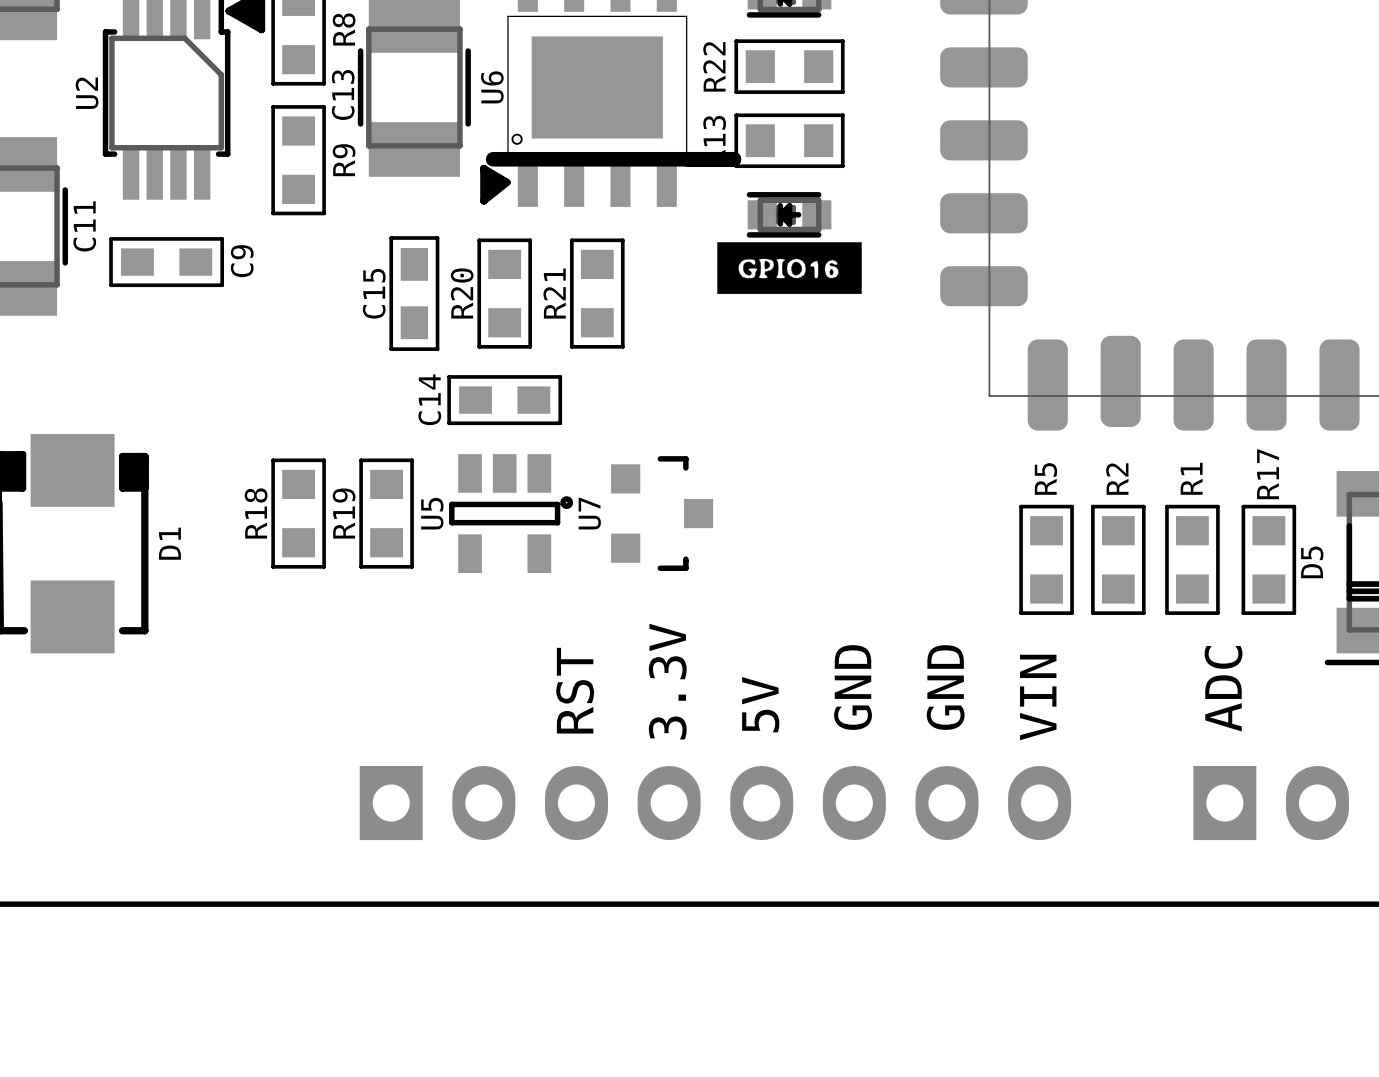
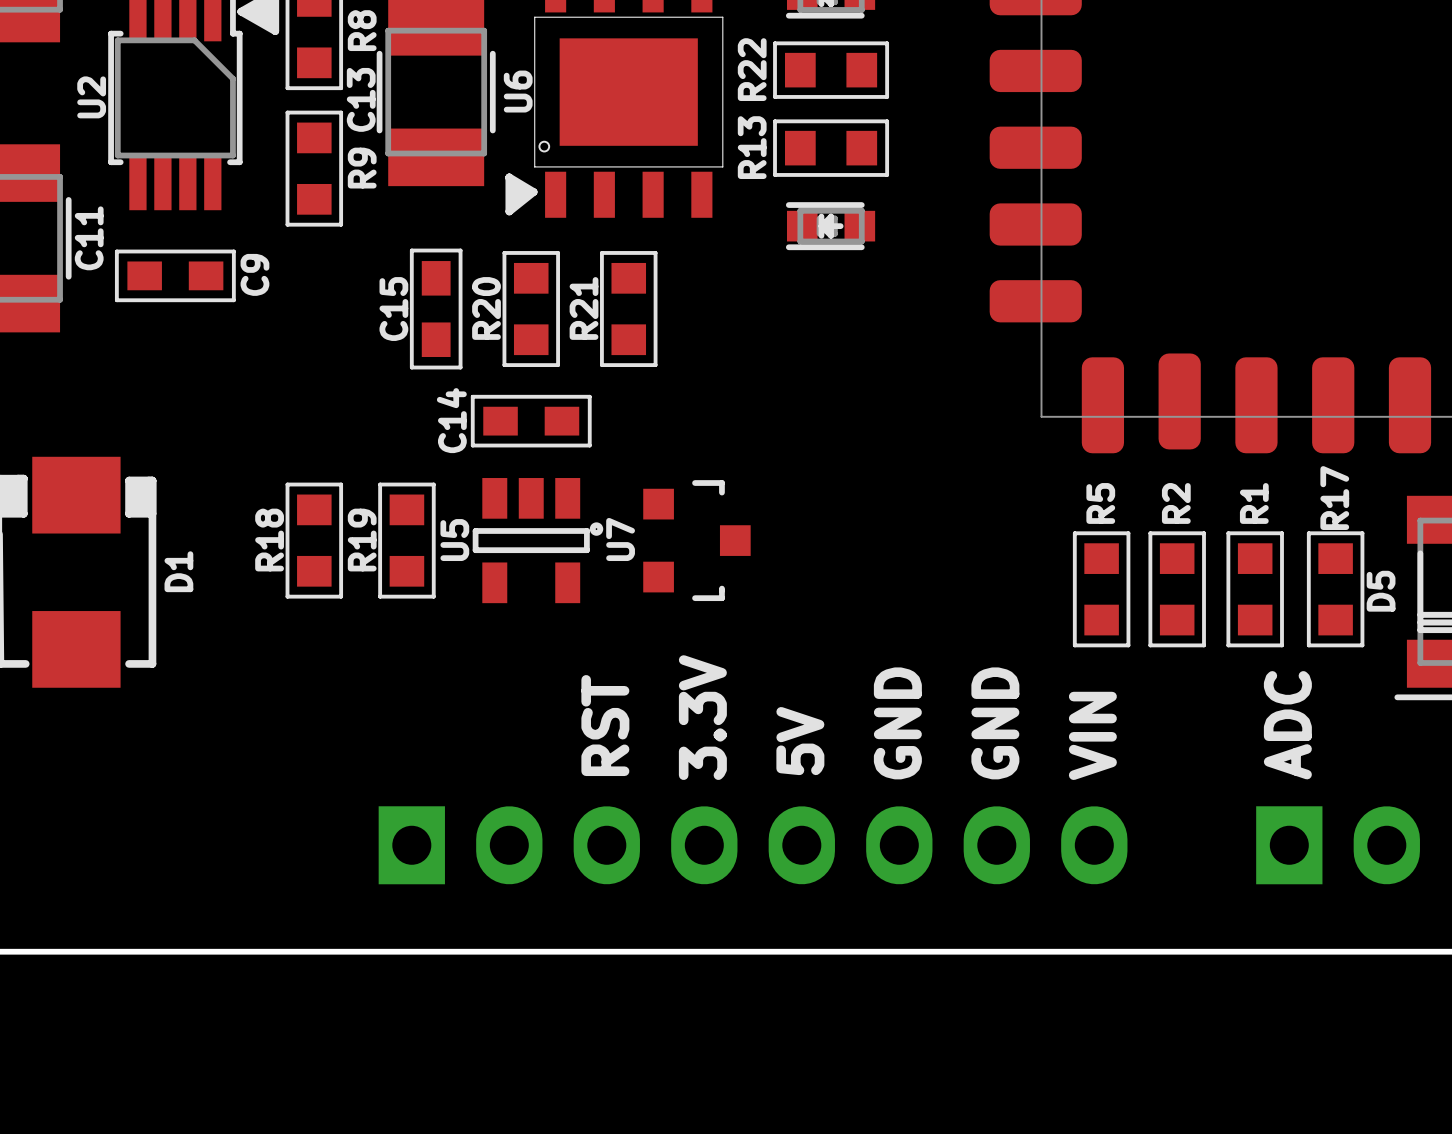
line: (493, 159) (733, 159) -> none
drawing: [717, 242, 862, 295] -> none

